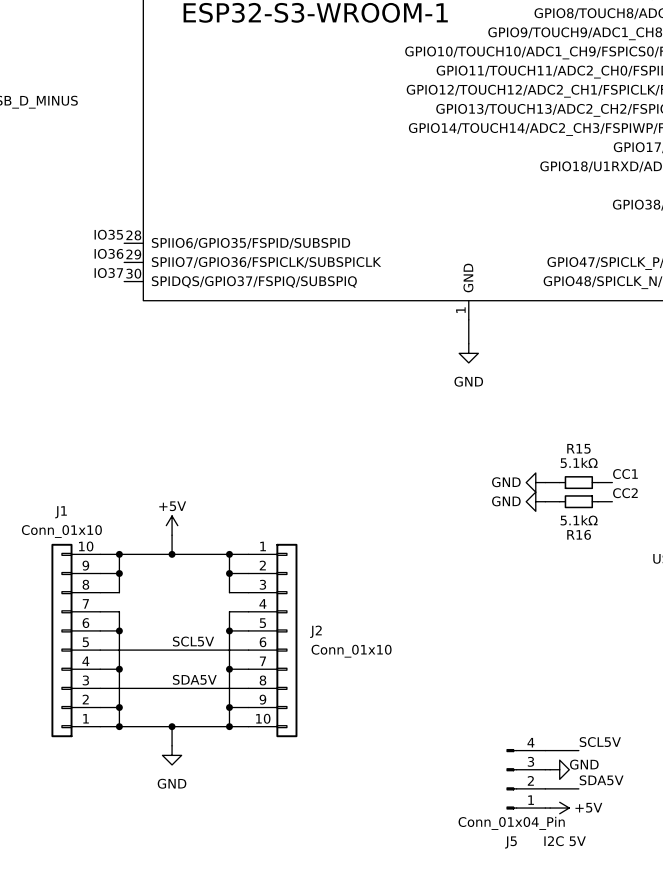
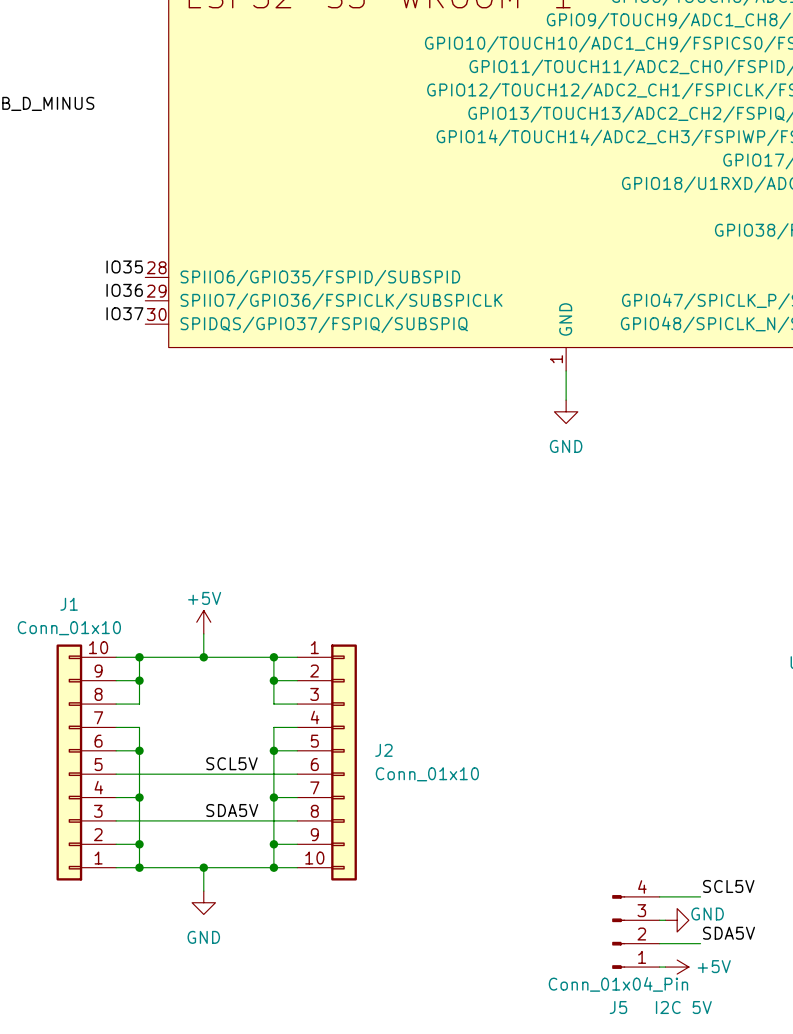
label: CC1 (625, 474) -> none
power symbol: GND (535, 482) -> none
wire: (545, 482) (559, 482) -> none
R15: 5.1kΩ (578, 482) -> none
wire: (598, 482) (612, 482) -> none
label: CC2 (625, 493) -> none
power symbol: GND (535, 501) -> none
wire: (545, 501) (559, 501) -> none
R16: 5.1kΩ (578, 501) -> none
wire: (598, 501) (612, 501) -> none

